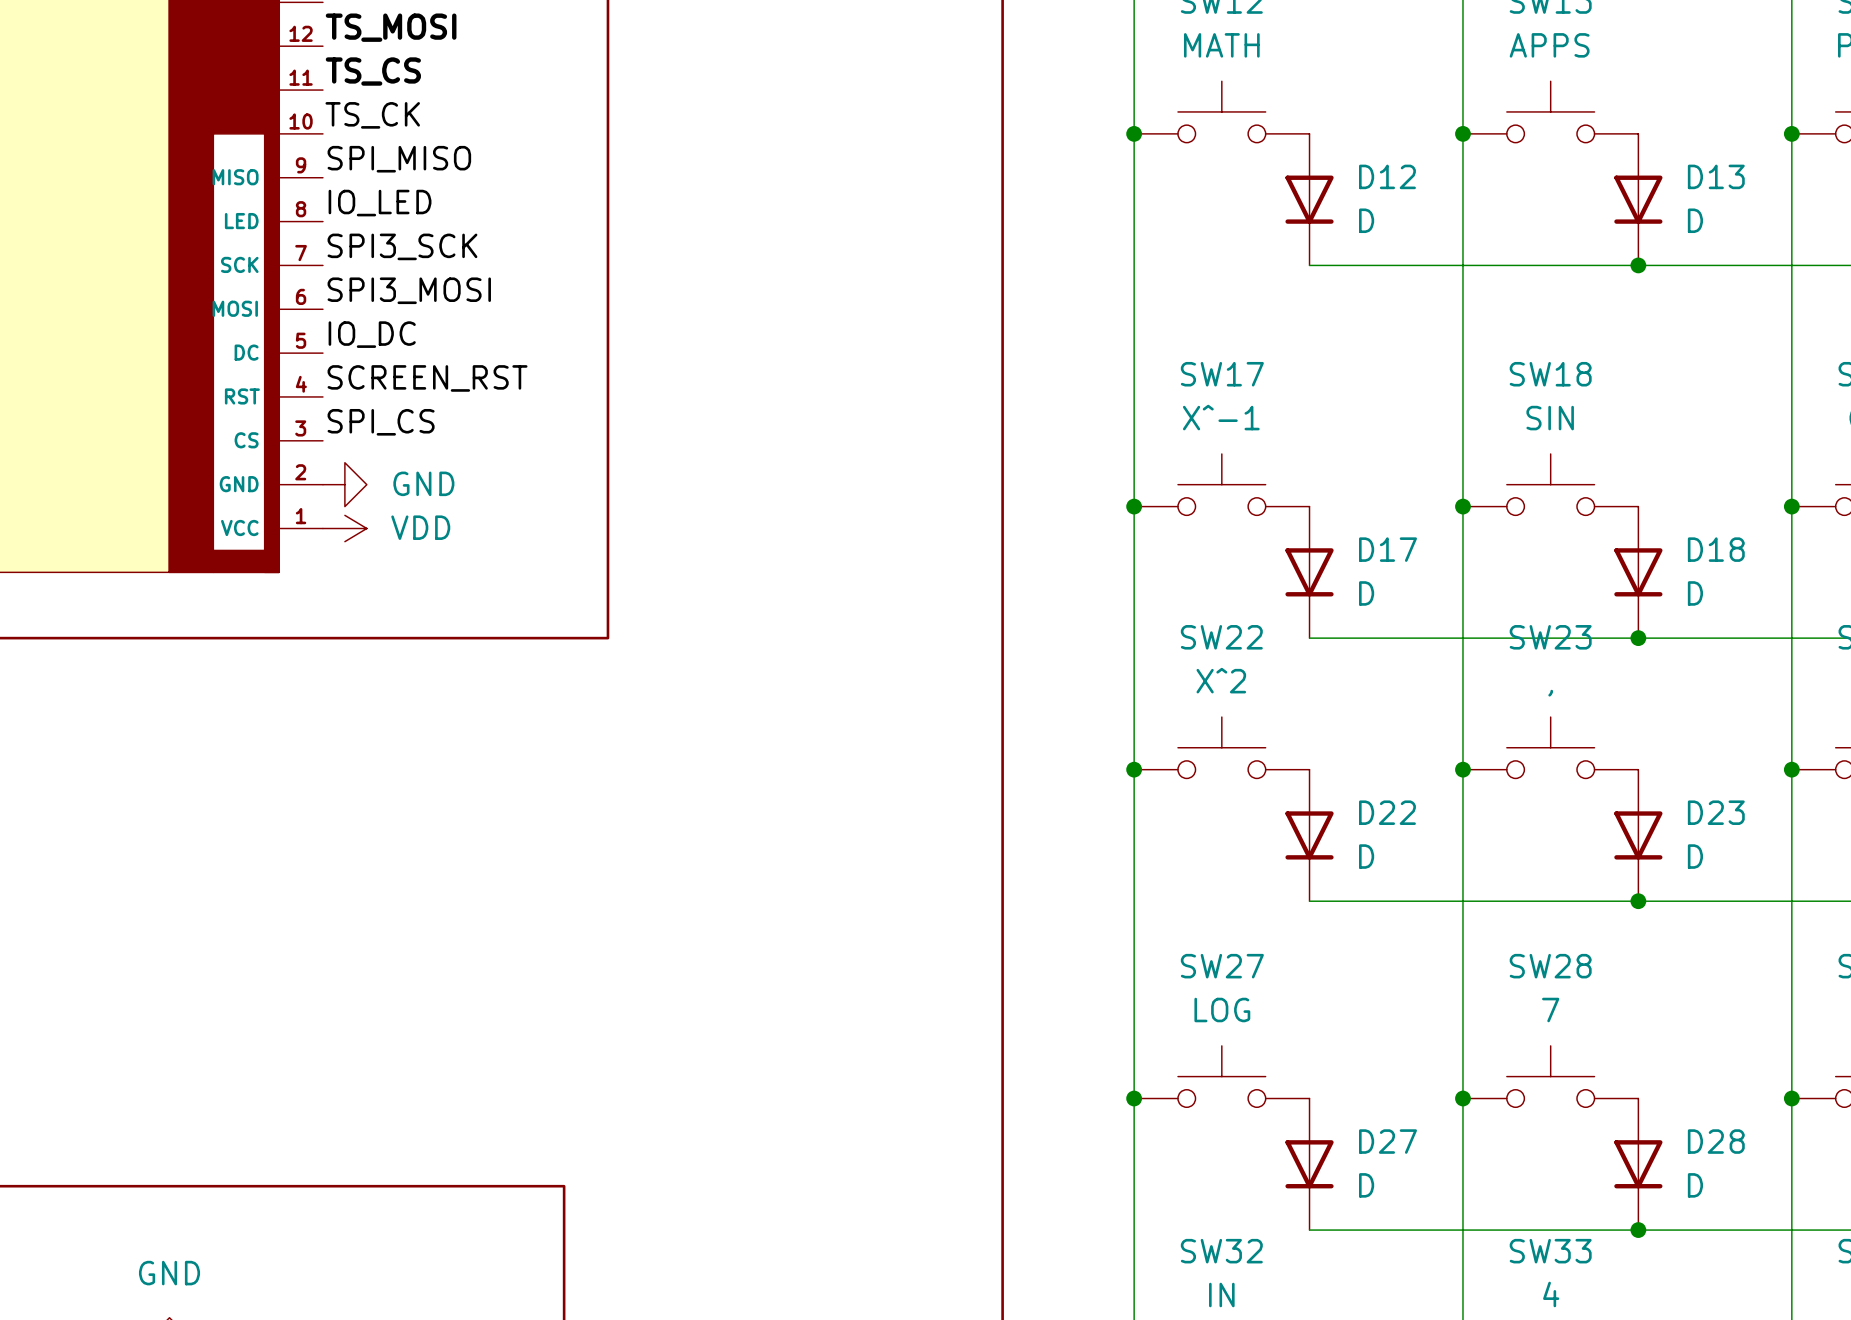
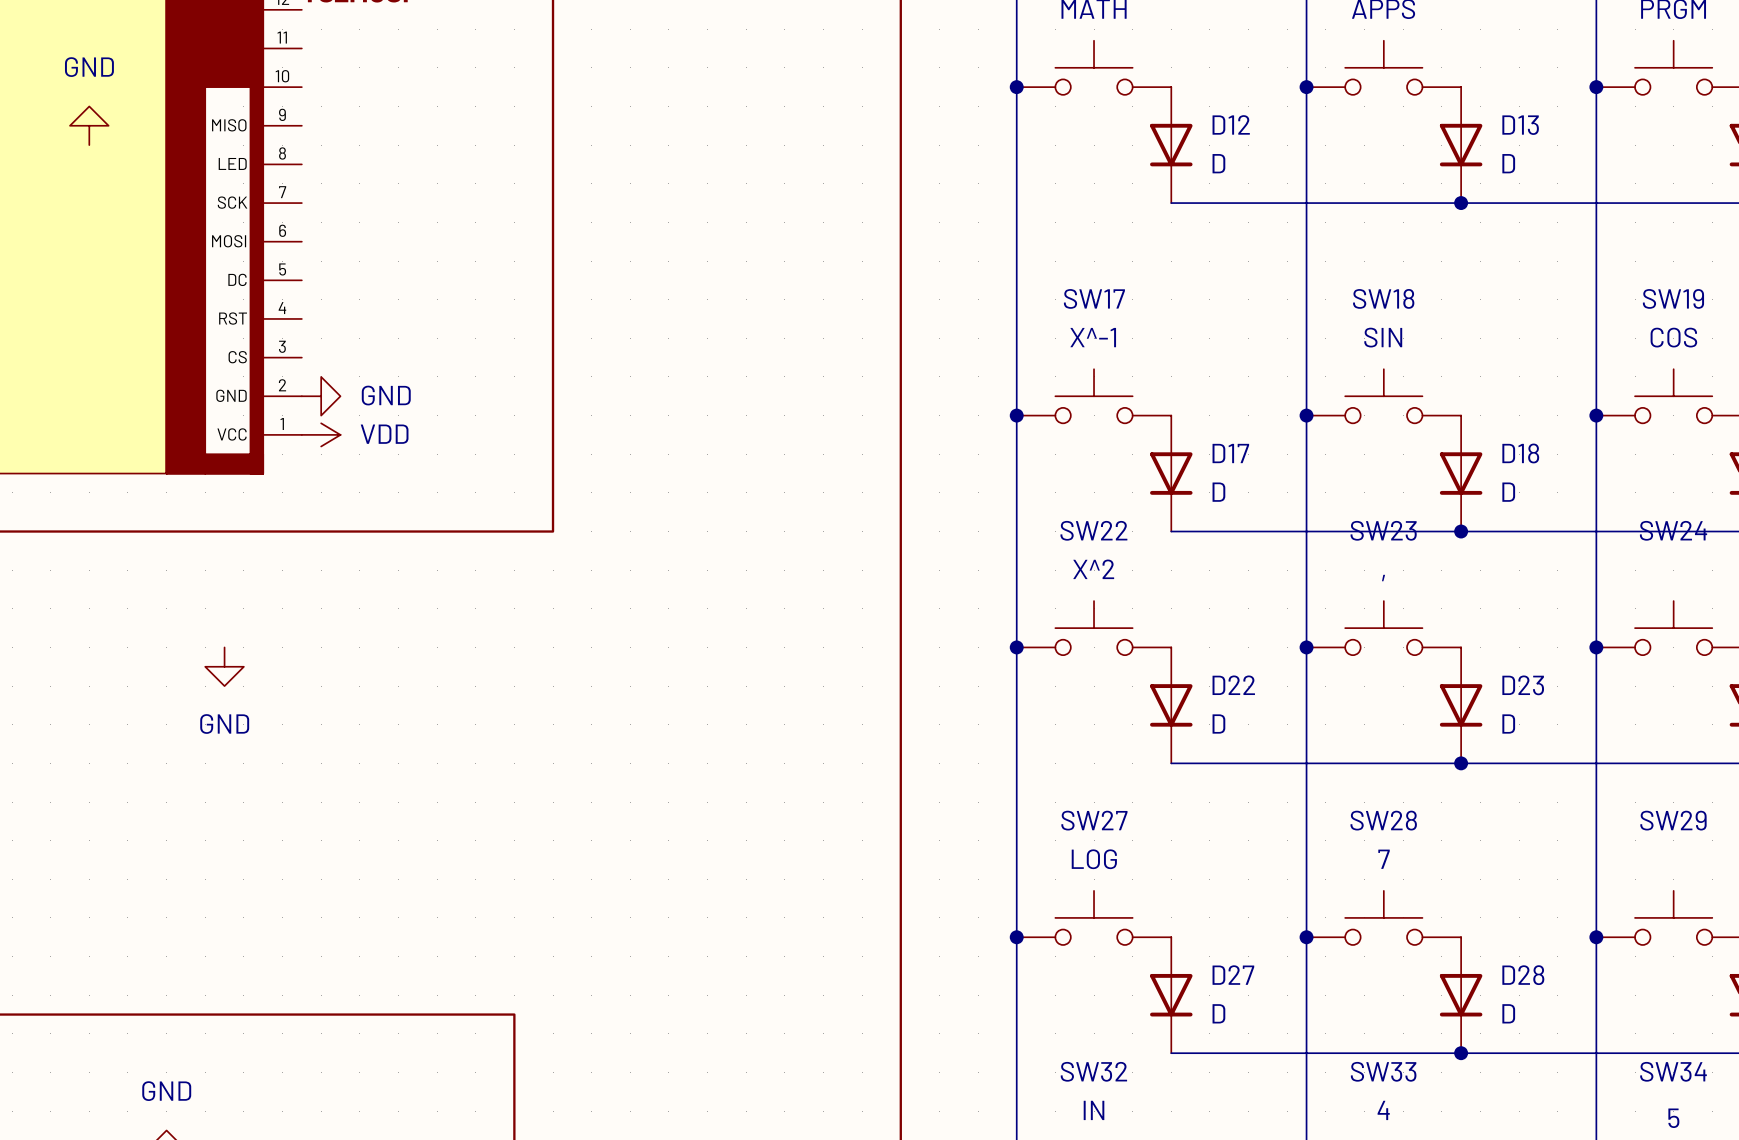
label: TS_CS (373, 71) -> none
label: TS_CK (372, 115) -> none
label: SPI_MISO (399, 159) -> none
power symbol: none -> GND (89, 125)
label: IO_LED (380, 203) -> none
label: SPI3_SCK (402, 246) -> none
label: SPI3_MOSI (409, 290) -> none
label: IO_DC (372, 334) -> none
label: SCREEN_RST (427, 378) -> none
label: SPI_CS (381, 422) -> none
power symbol: none -> GND (224, 666)

